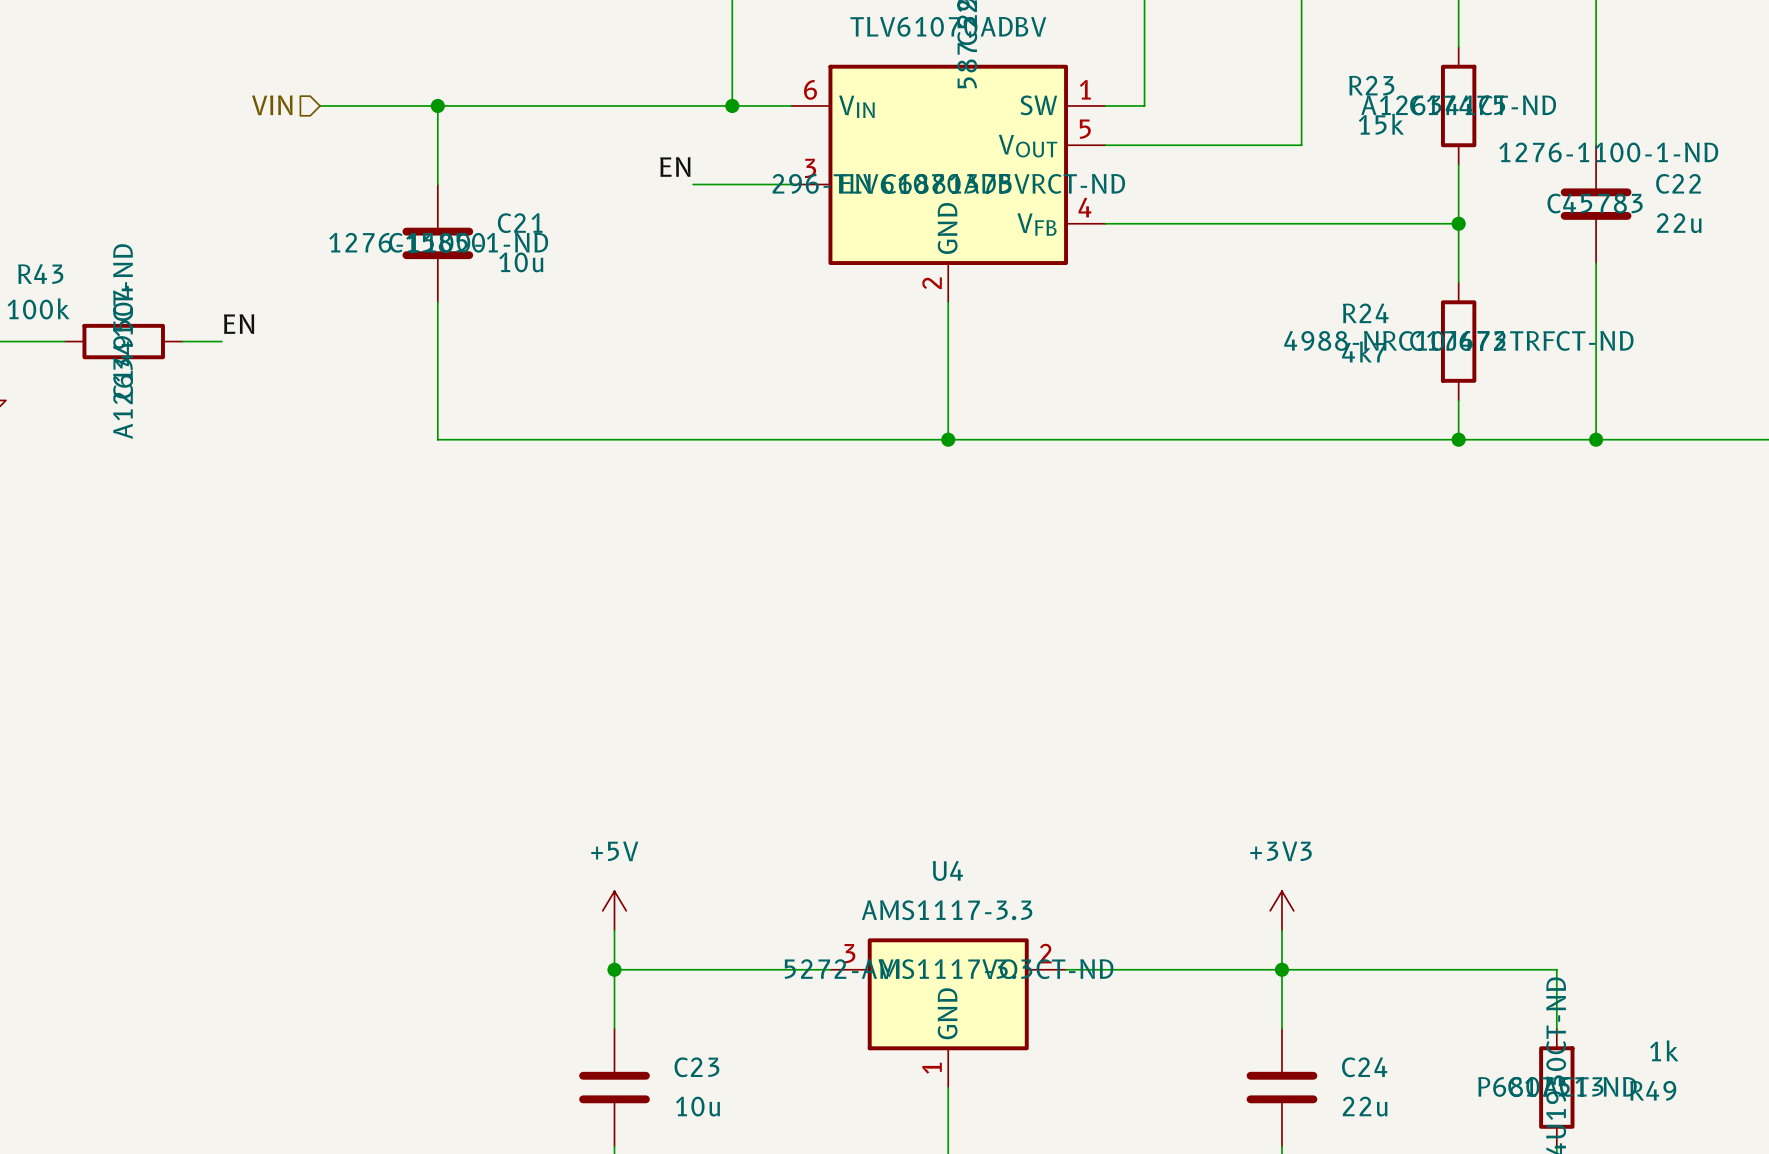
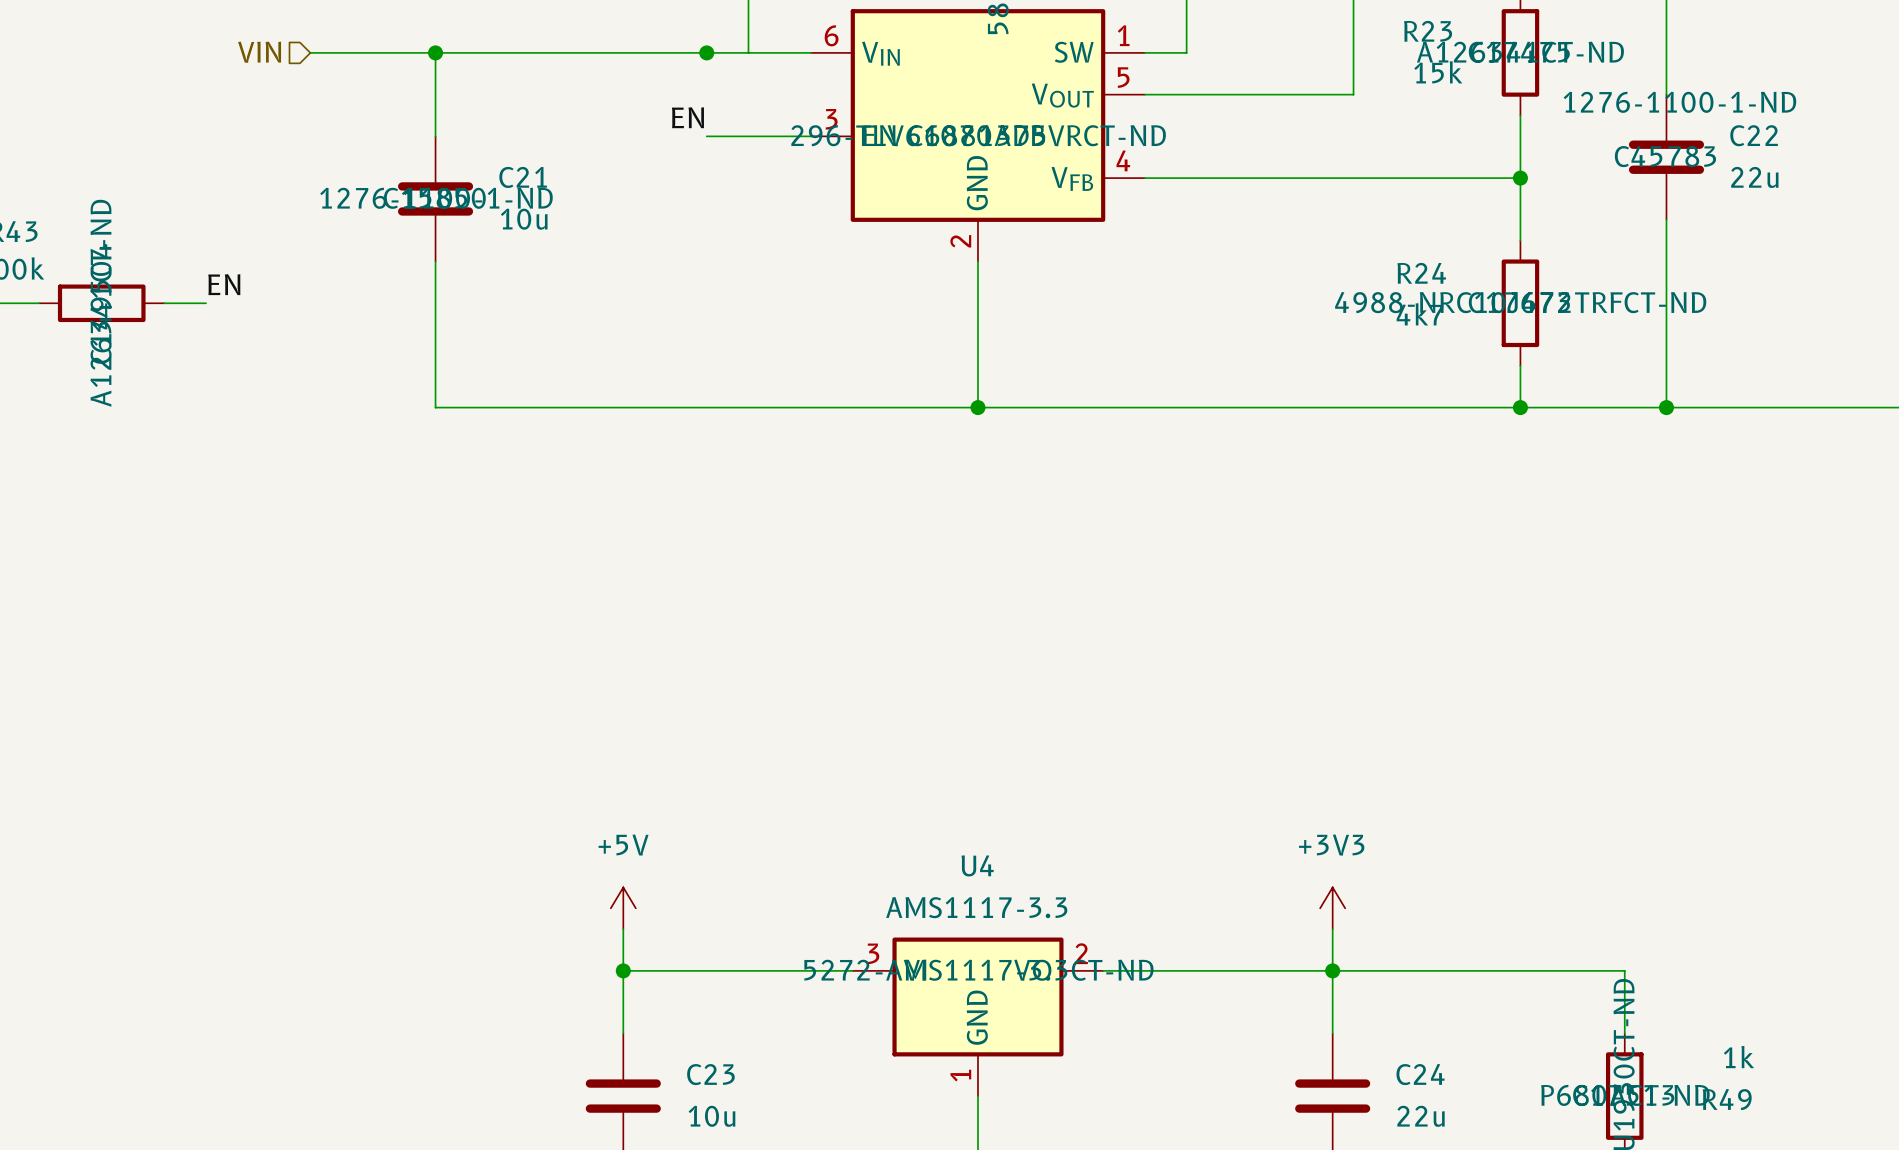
junction position: (732, 105) -> (706, 52)

